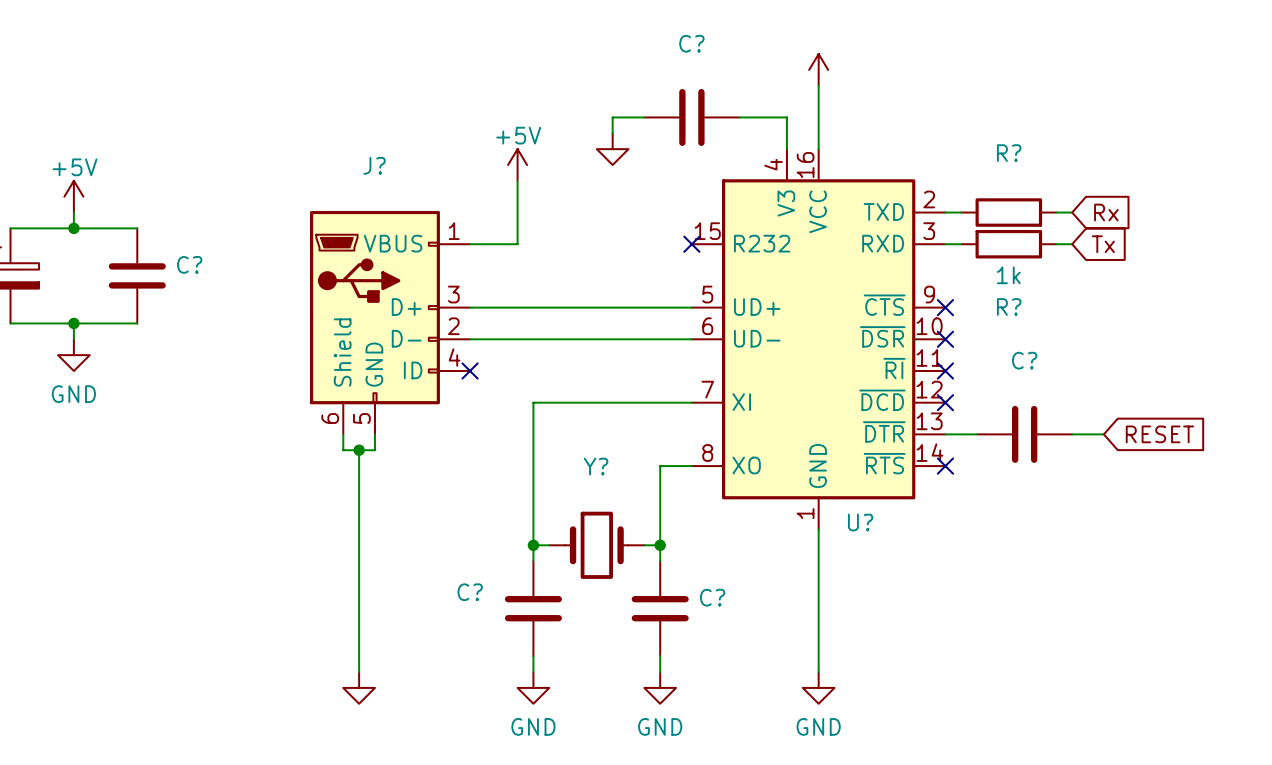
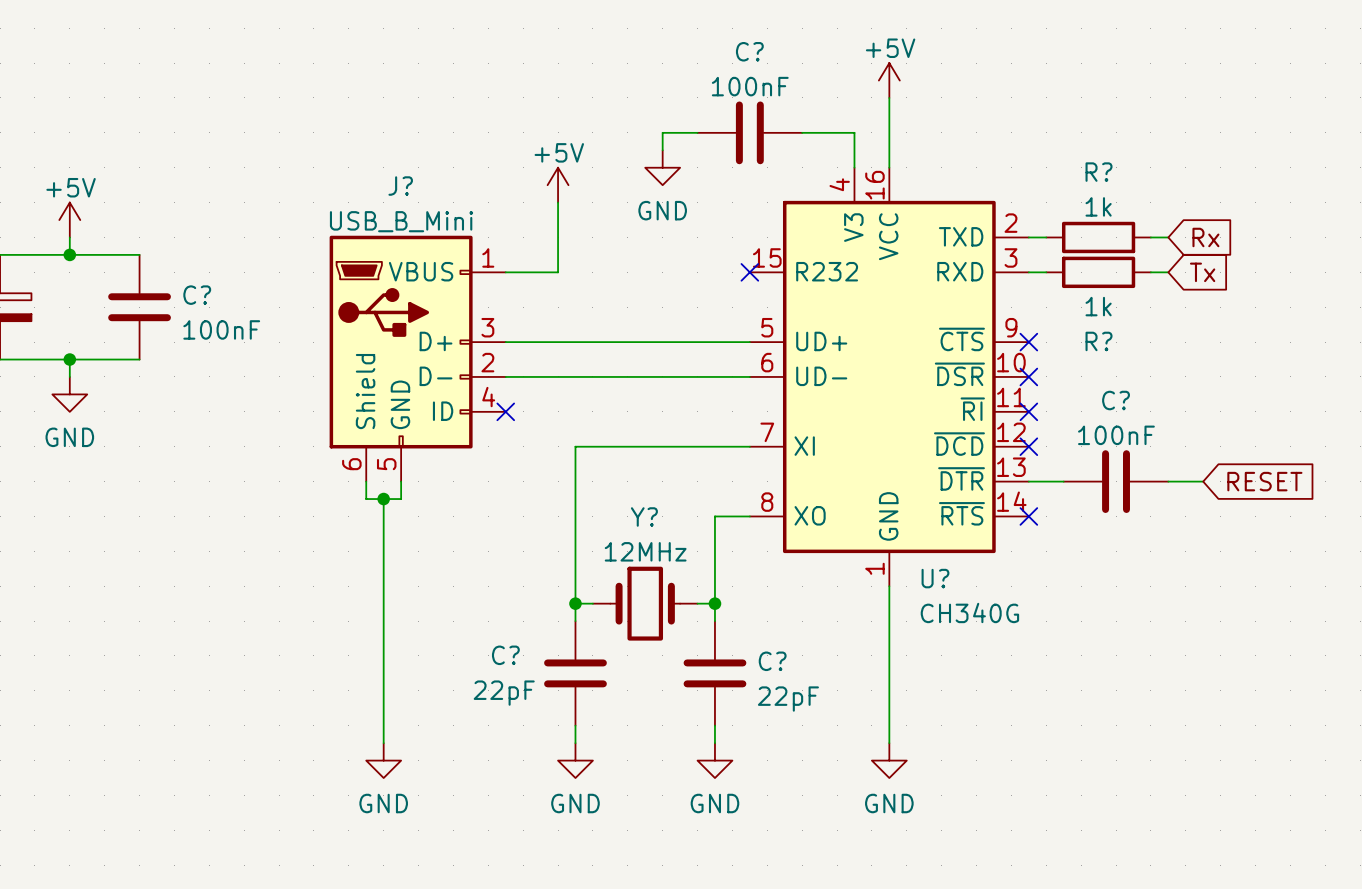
power symbol text: none -> +5V (890, 48)
C? value: none -> 100nF (750, 86)
R? value: none -> 1k (1098, 206)
power symbol text: none -> GND (662, 210)
J? value: none -> USB_B_Mini (401, 221)
C? value: none -> 100nF (221, 329)
C? value: none -> 100nF (1116, 435)
Y? value: none -> 12MHz (645, 551)
U? value: none -> CH340G (969, 612)
C? value: none -> 22pF (504, 693)
C? value: none -> 22pF (788, 699)
power symbol text: none -> GND (383, 803)

